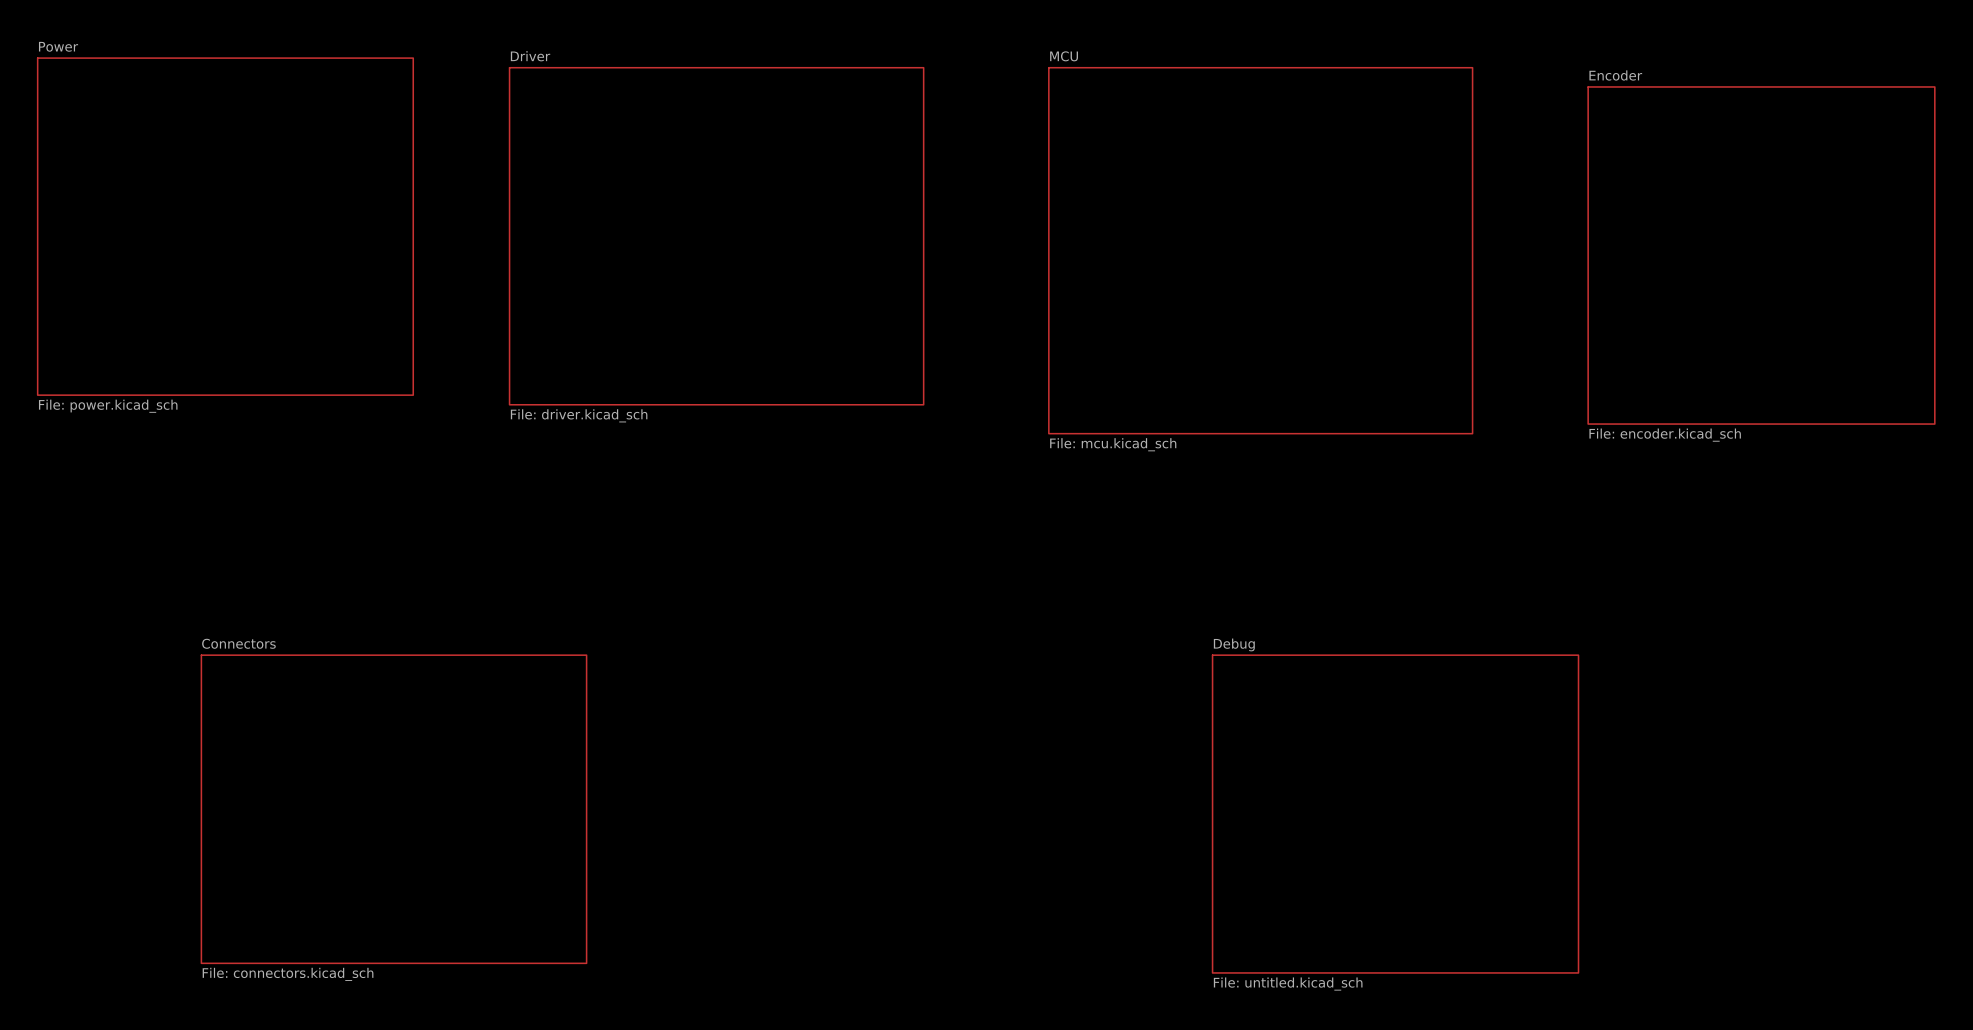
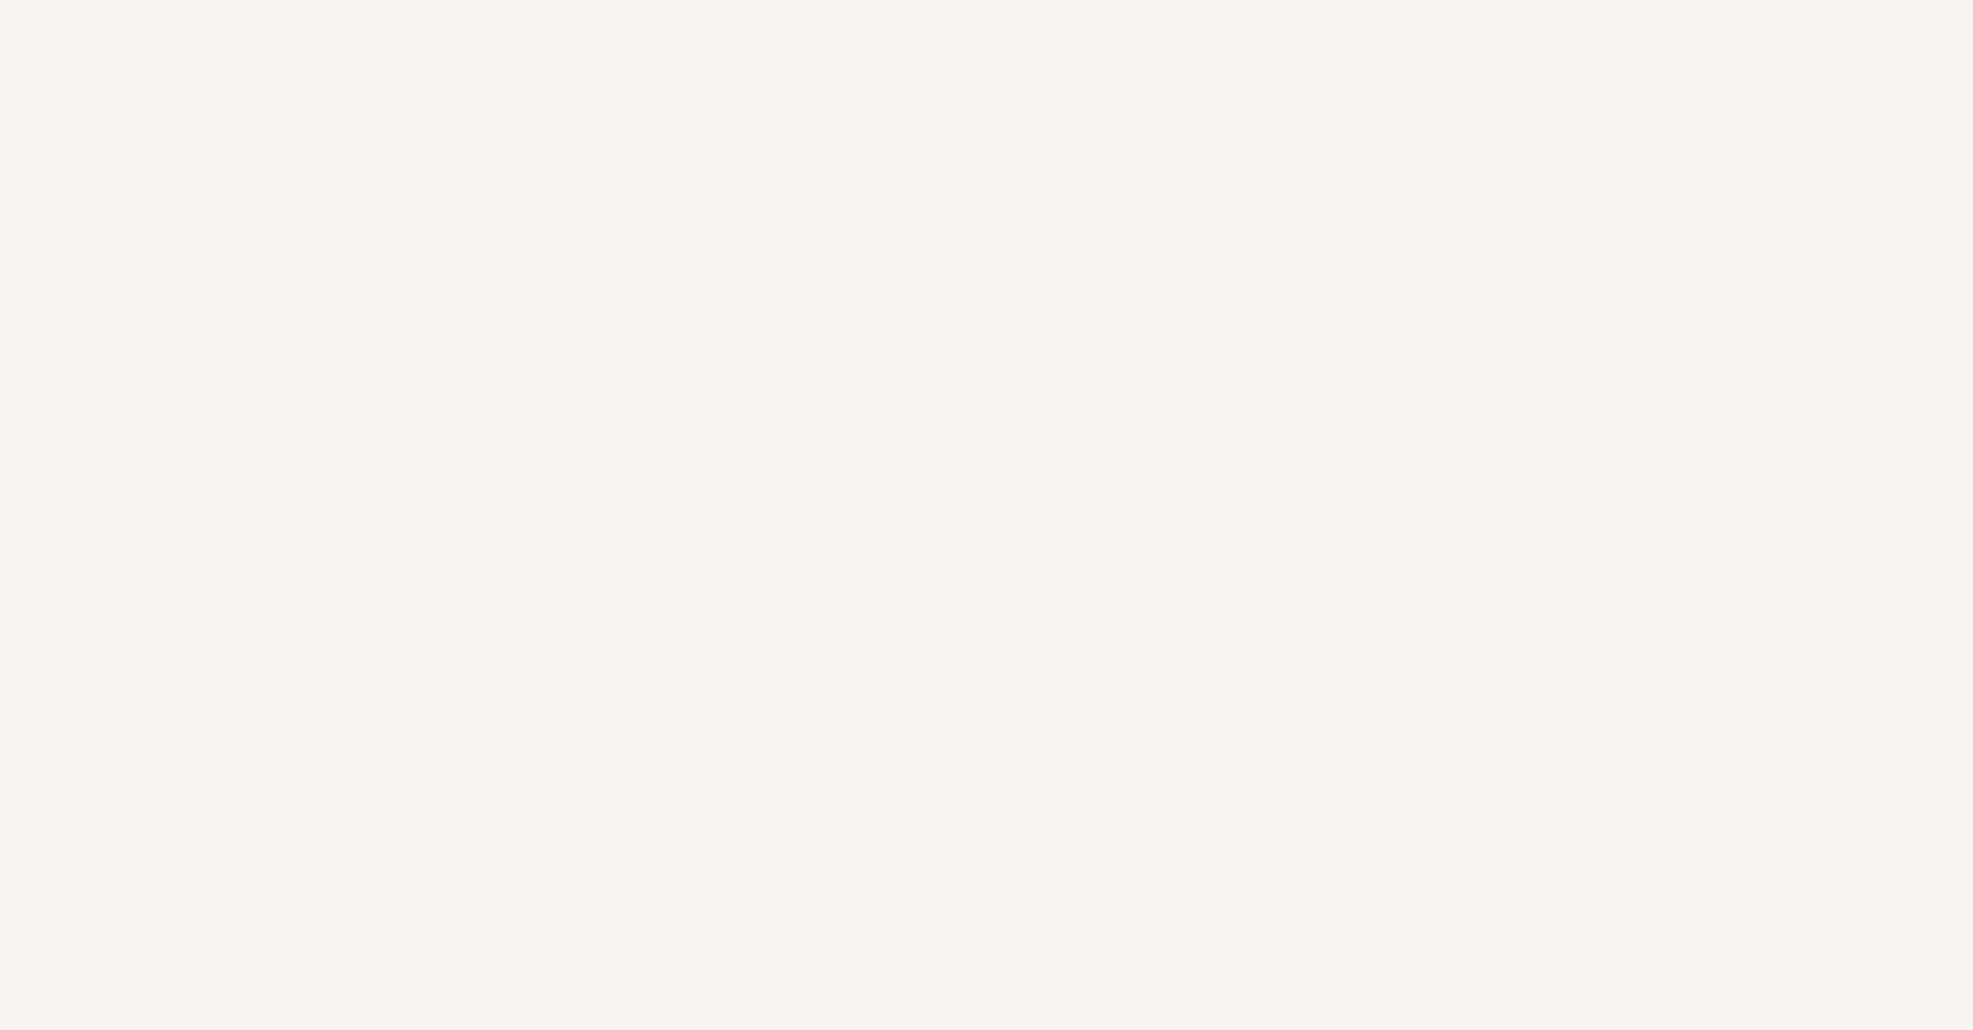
sheet Power: File: power.kicad_sch (225, 226) -> none
sheet Driver: File: driver.kicad_sch (716, 236) -> none
sheet MCU: File: mcu.kicad_sch (1260, 250) -> none
sheet Encoder: File: encoder.kicad_sch (1761, 255) -> none
sheet Connectors: File: connectors.kicad_sch (393, 809) -> none
sheet Debug: File: untitled.kicad_sch (1395, 814) -> none

